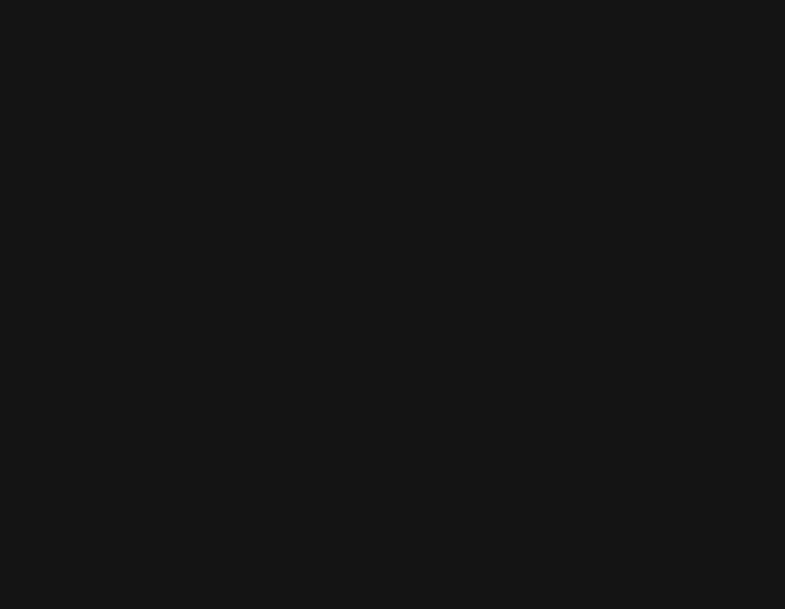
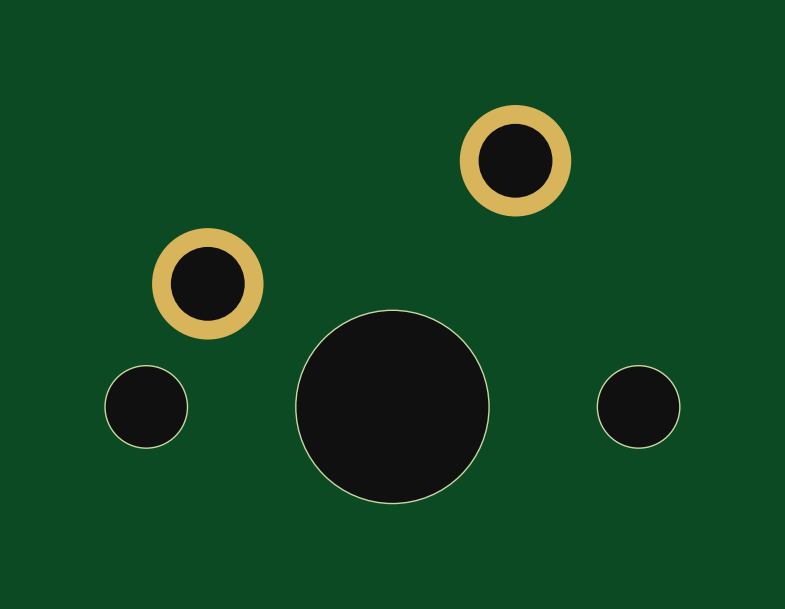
part: none -> (392, 304)

